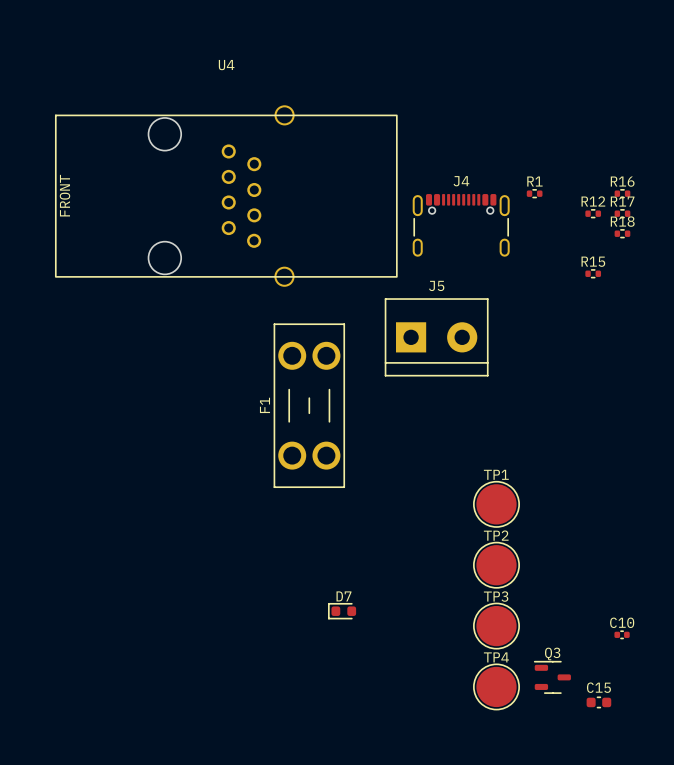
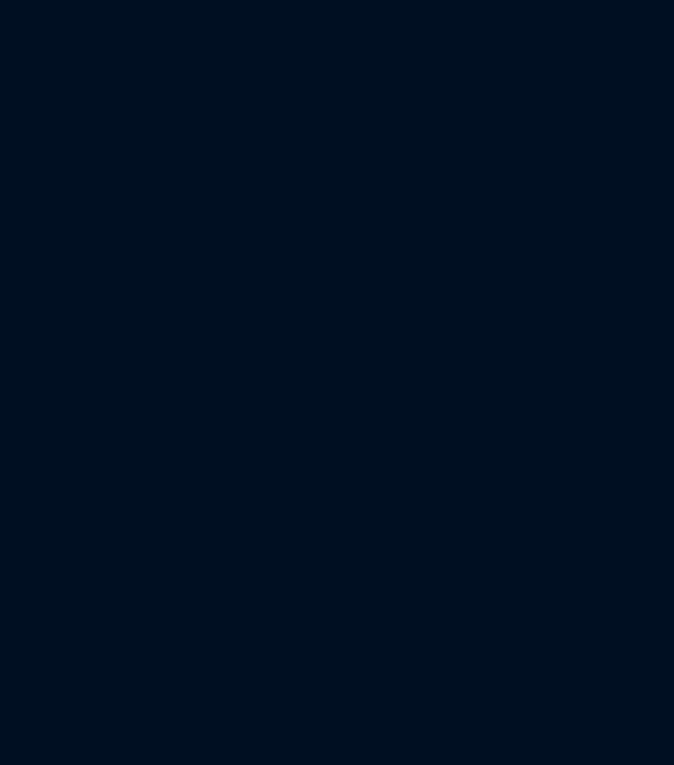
R1: (534, 193) -> none
R16: (622, 193) -> none
U4: (226, 196) -> none
R12: (593, 213) -> none
R17: (622, 213) -> none
J4: (461, 225) -> none
R18: (622, 233) -> none
R15: (593, 273) -> none
J5: (436, 337) -> none
F1: (309, 405) -> none
TP1: (496, 504) -> none
TP2: (496, 565) -> none
D7: (342, 611) -> none
TP3: (496, 626) -> none
C10: (622, 634) -> none
Q3: (552, 677) -> none
TP4: (496, 686) -> none
C15: (598, 702) -> none

